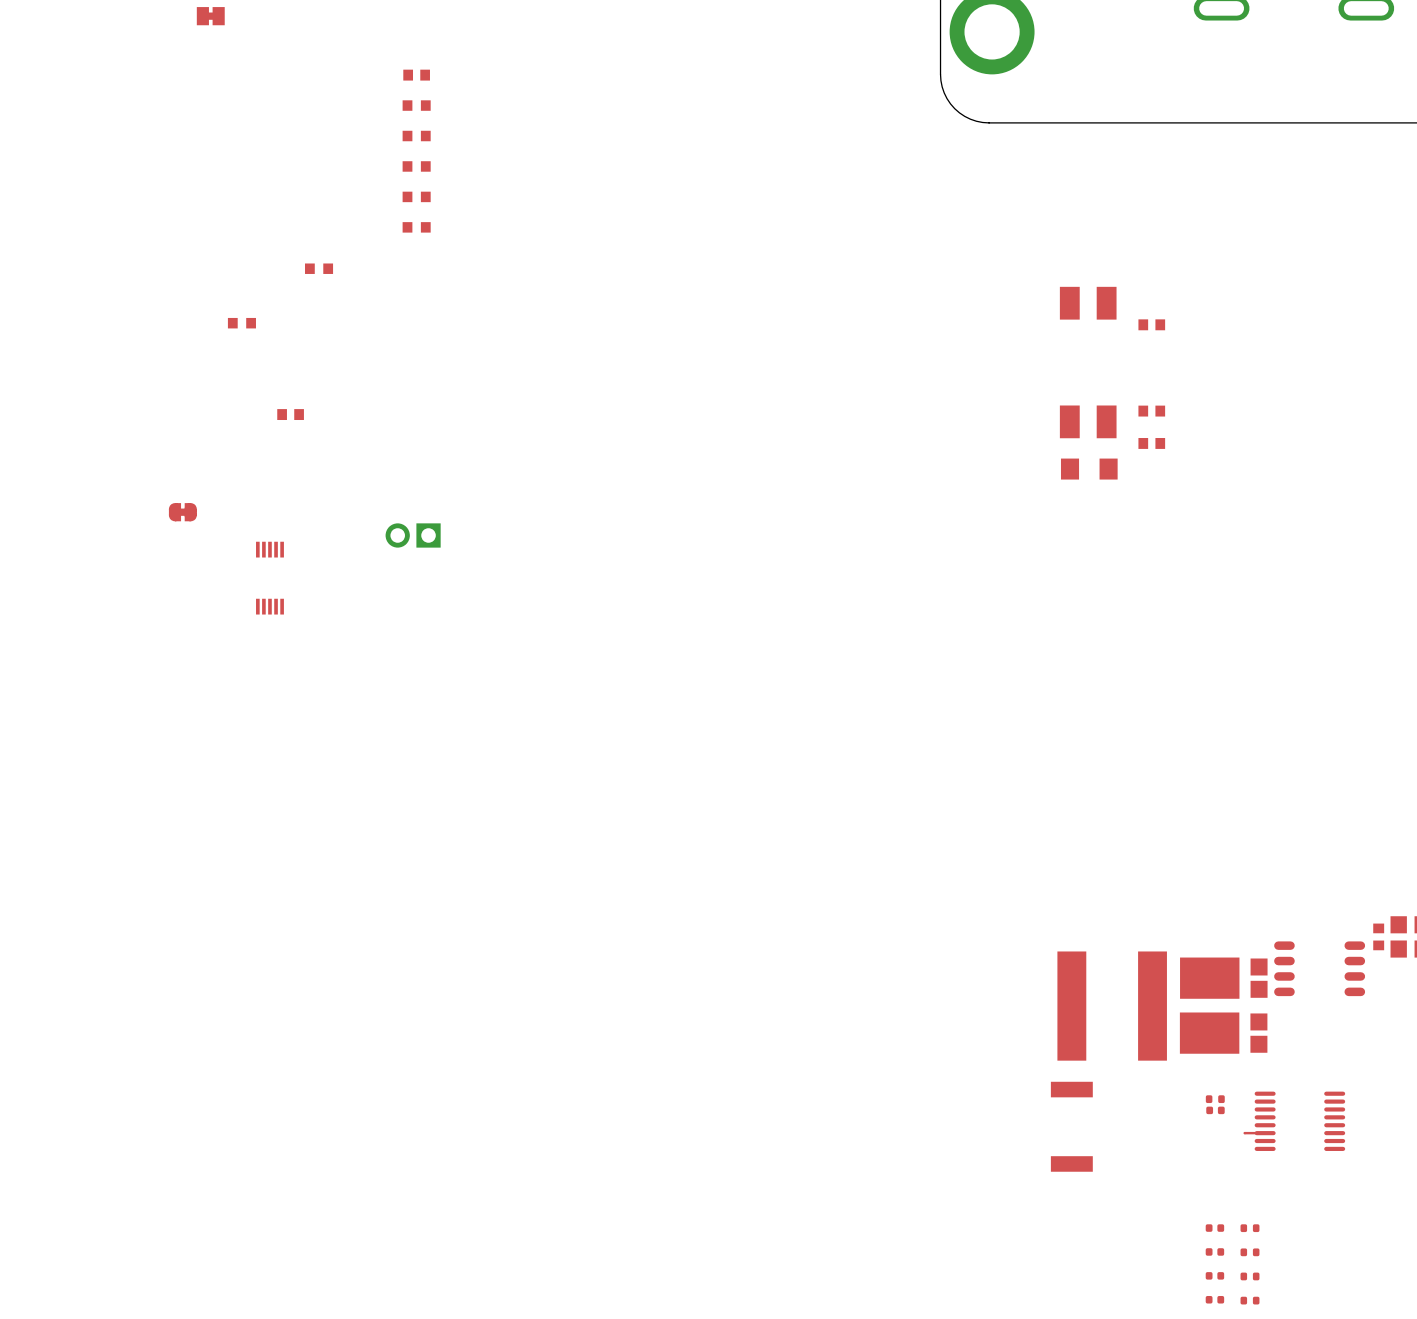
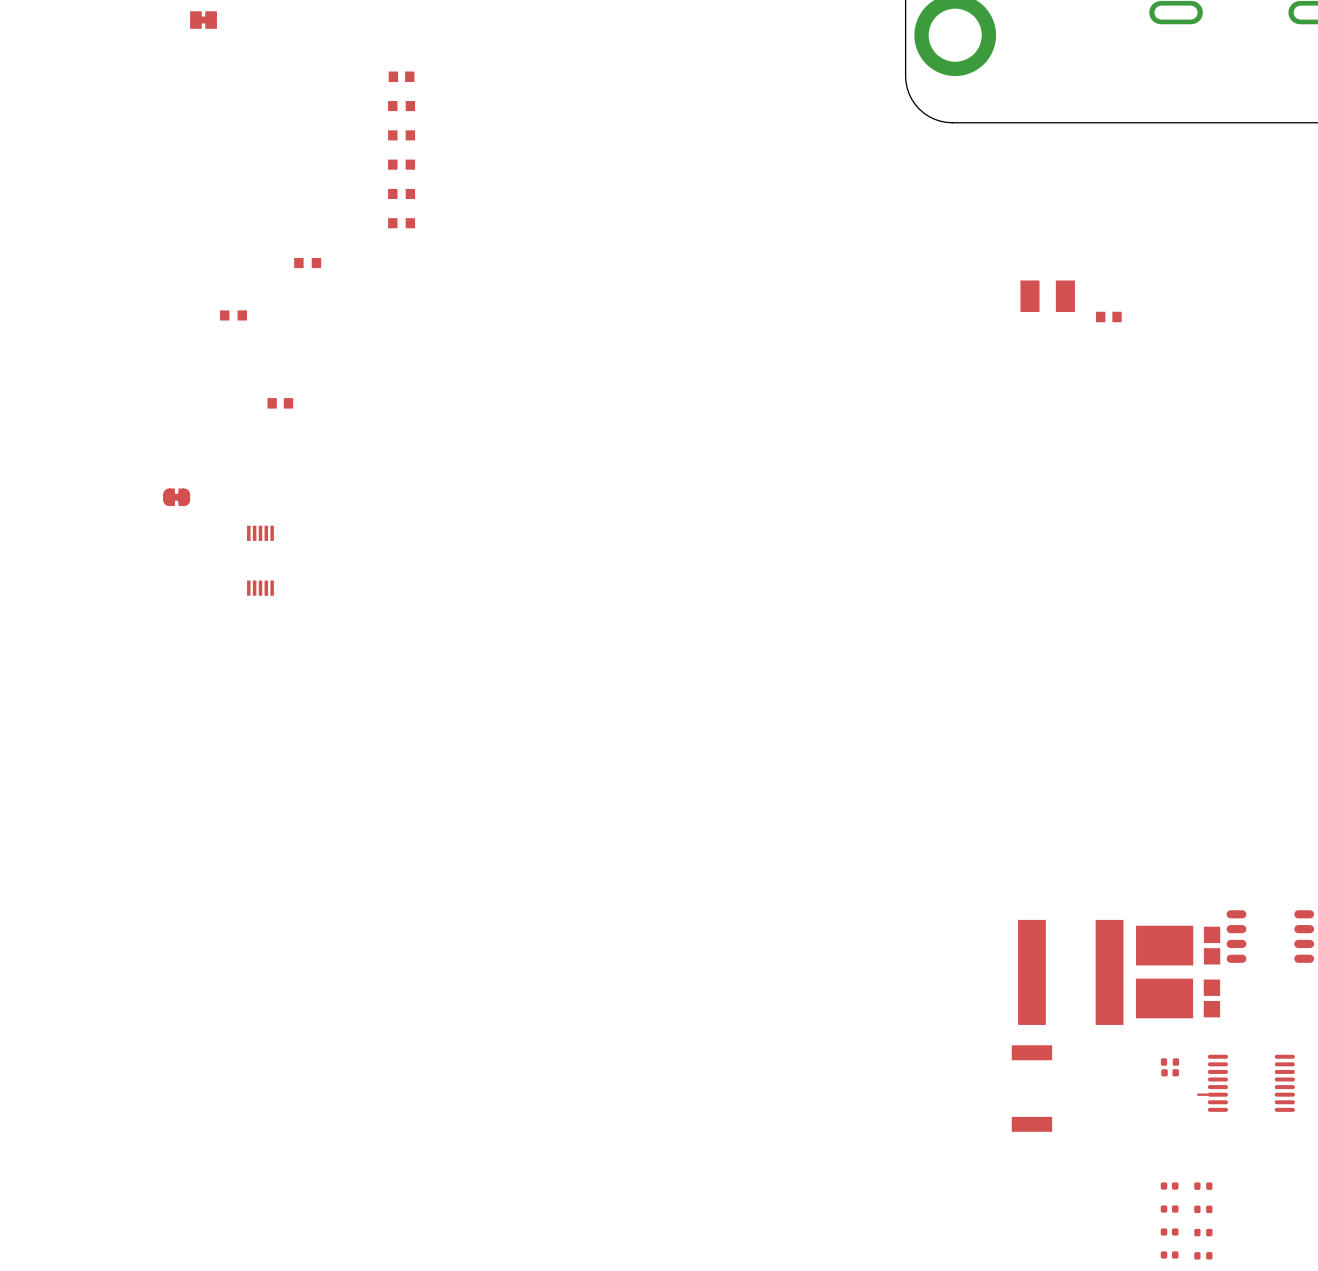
part: (1151, 411) -> none
part: (1088, 421) -> none
part: (1151, 443) -> none
part: (1089, 469) -> none
part: (413, 535) -> none

